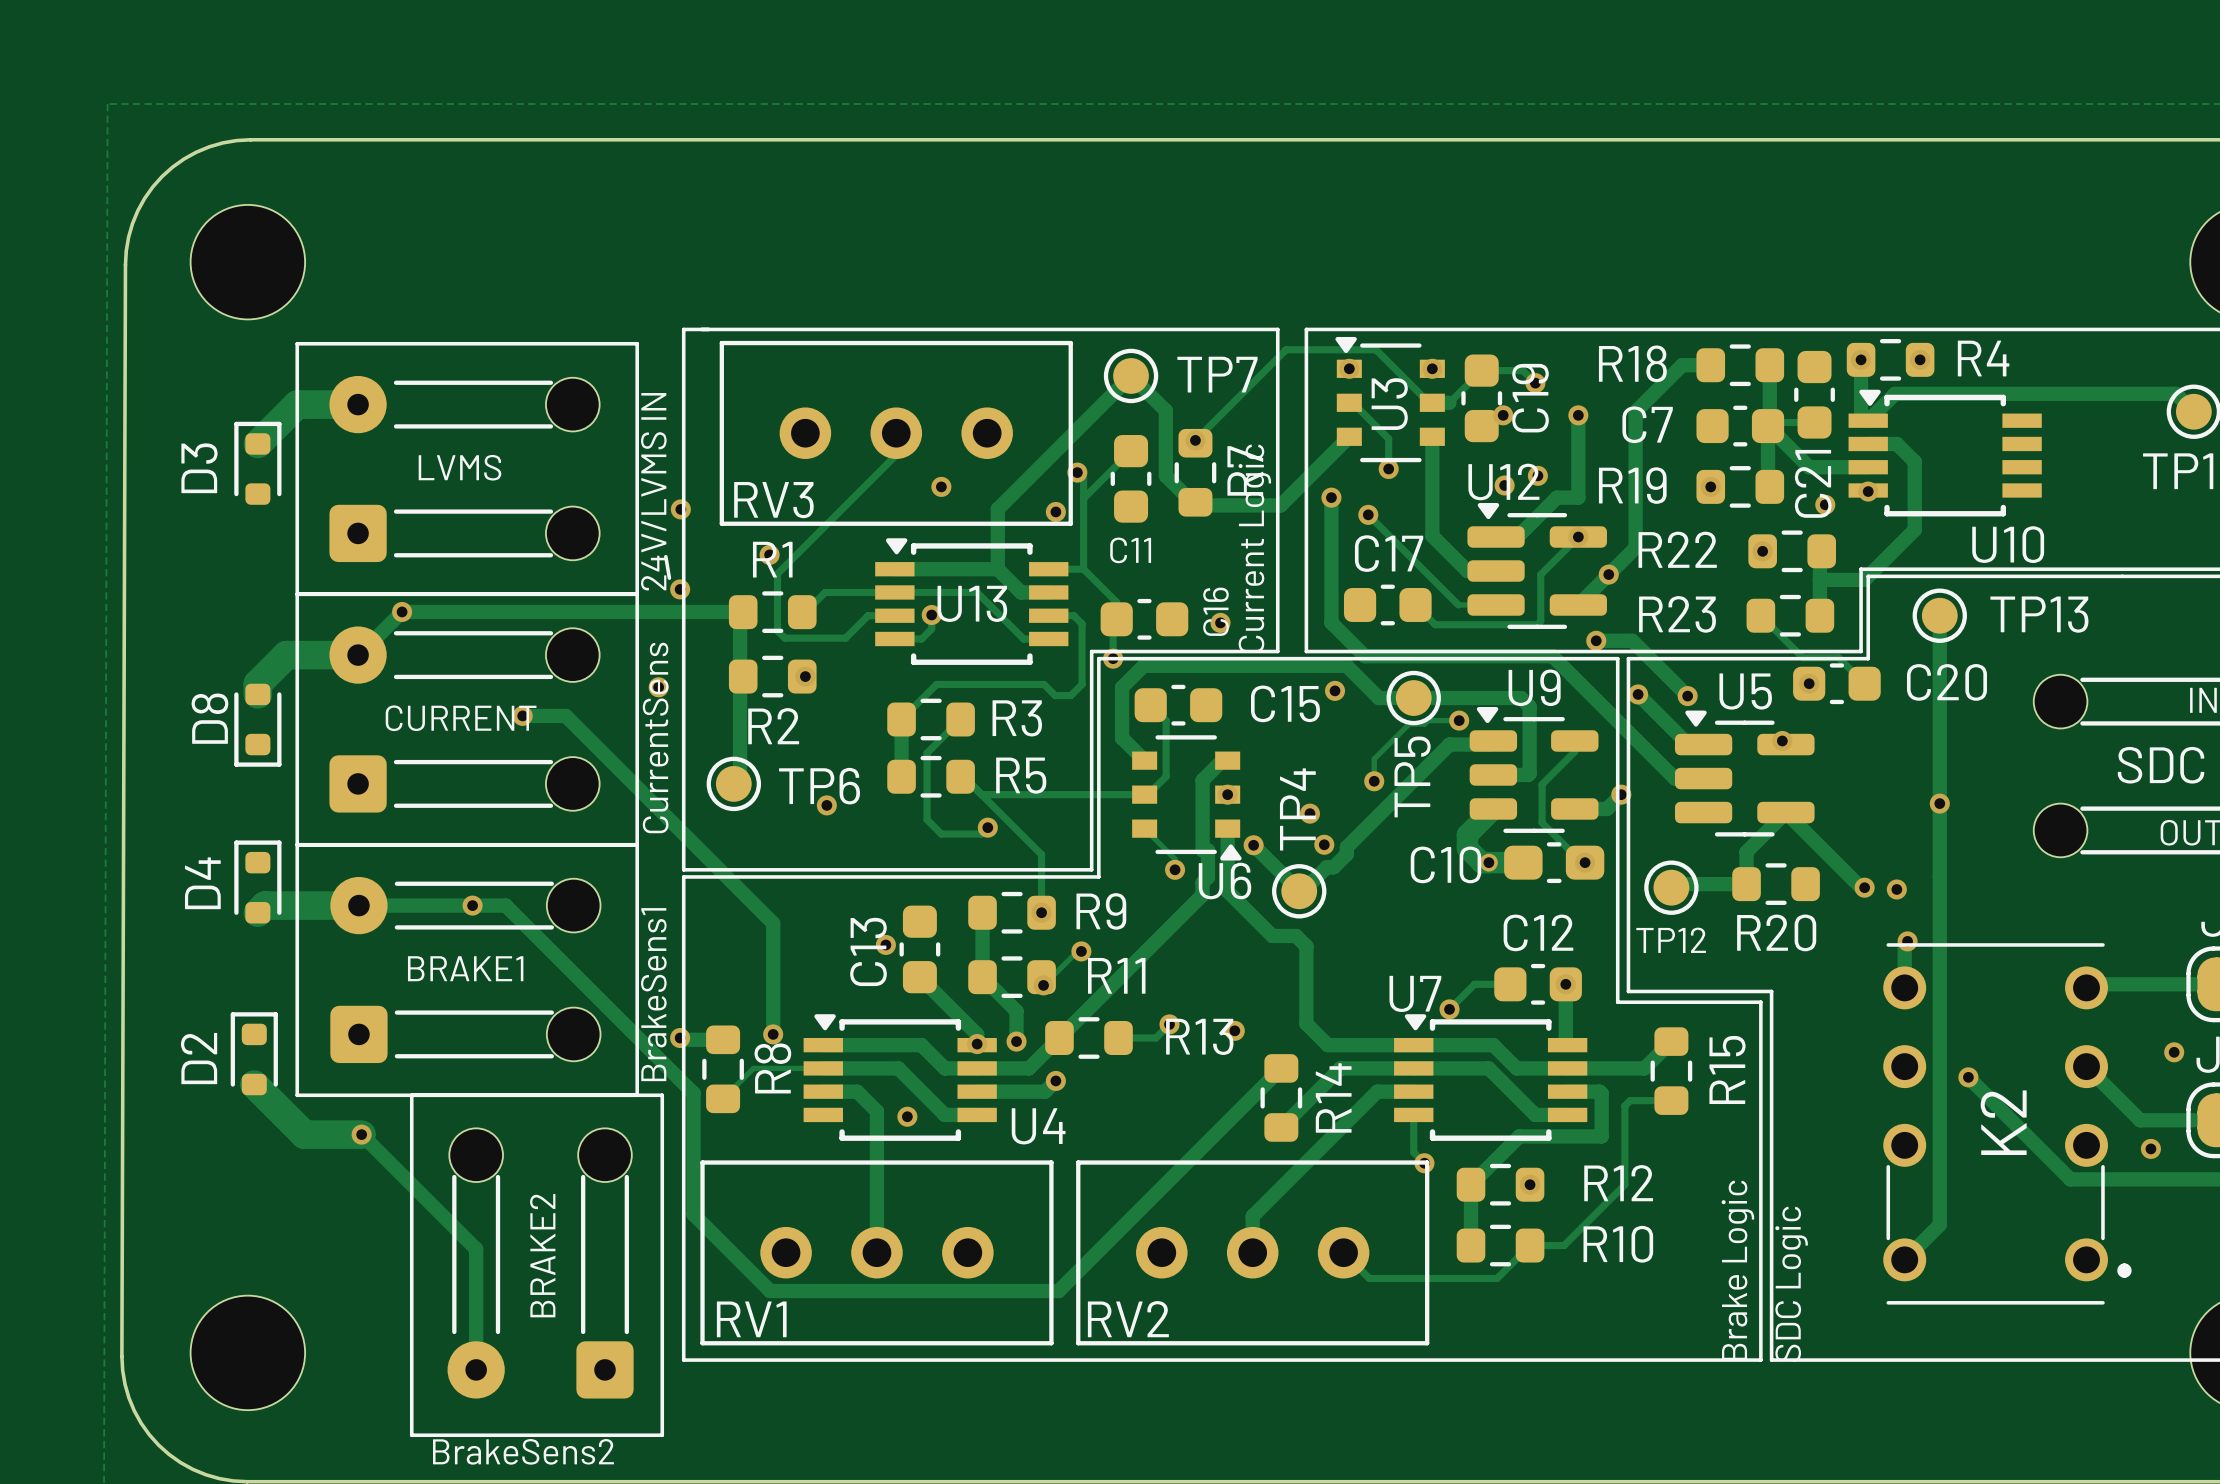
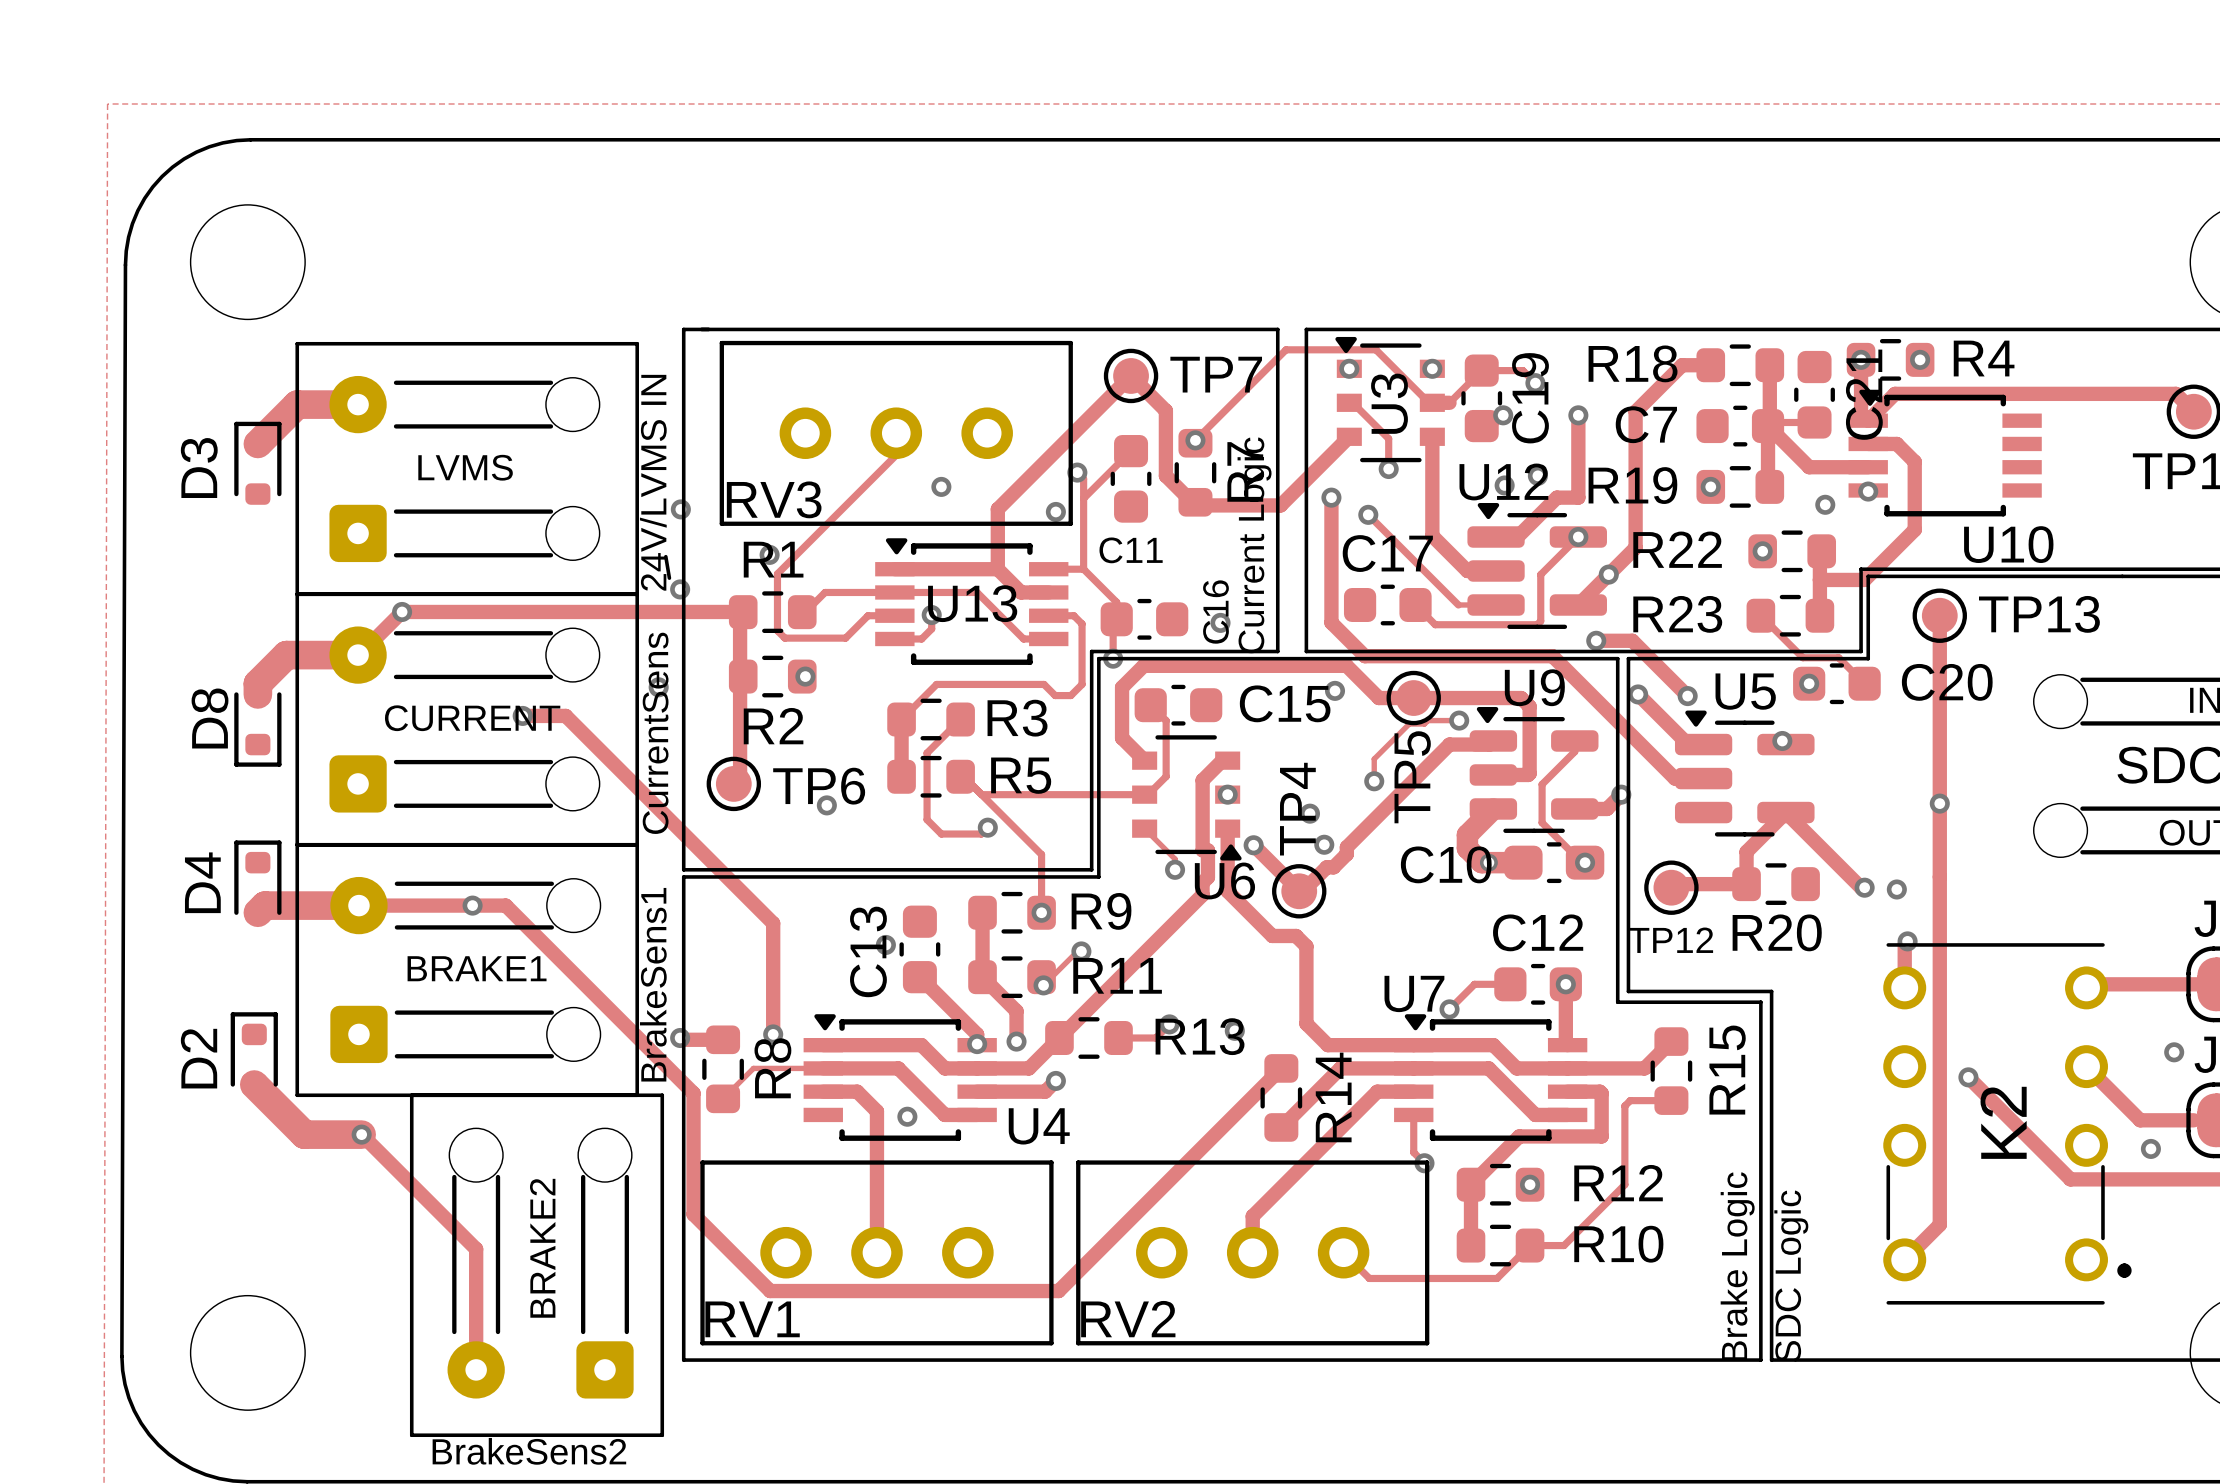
C21 name position: C21 (1813, 483) -> C21 (1864, 394)

